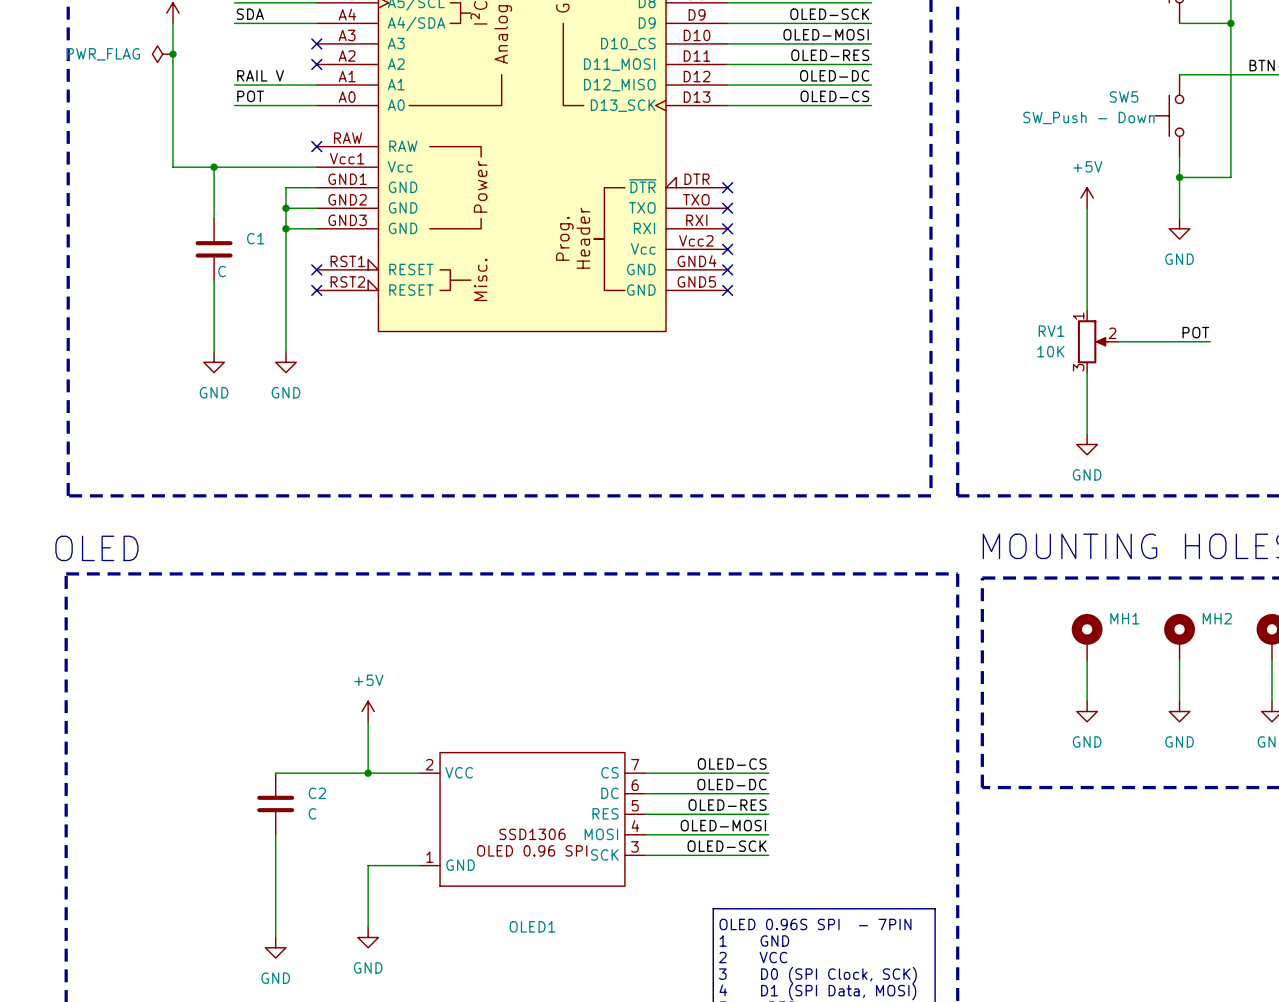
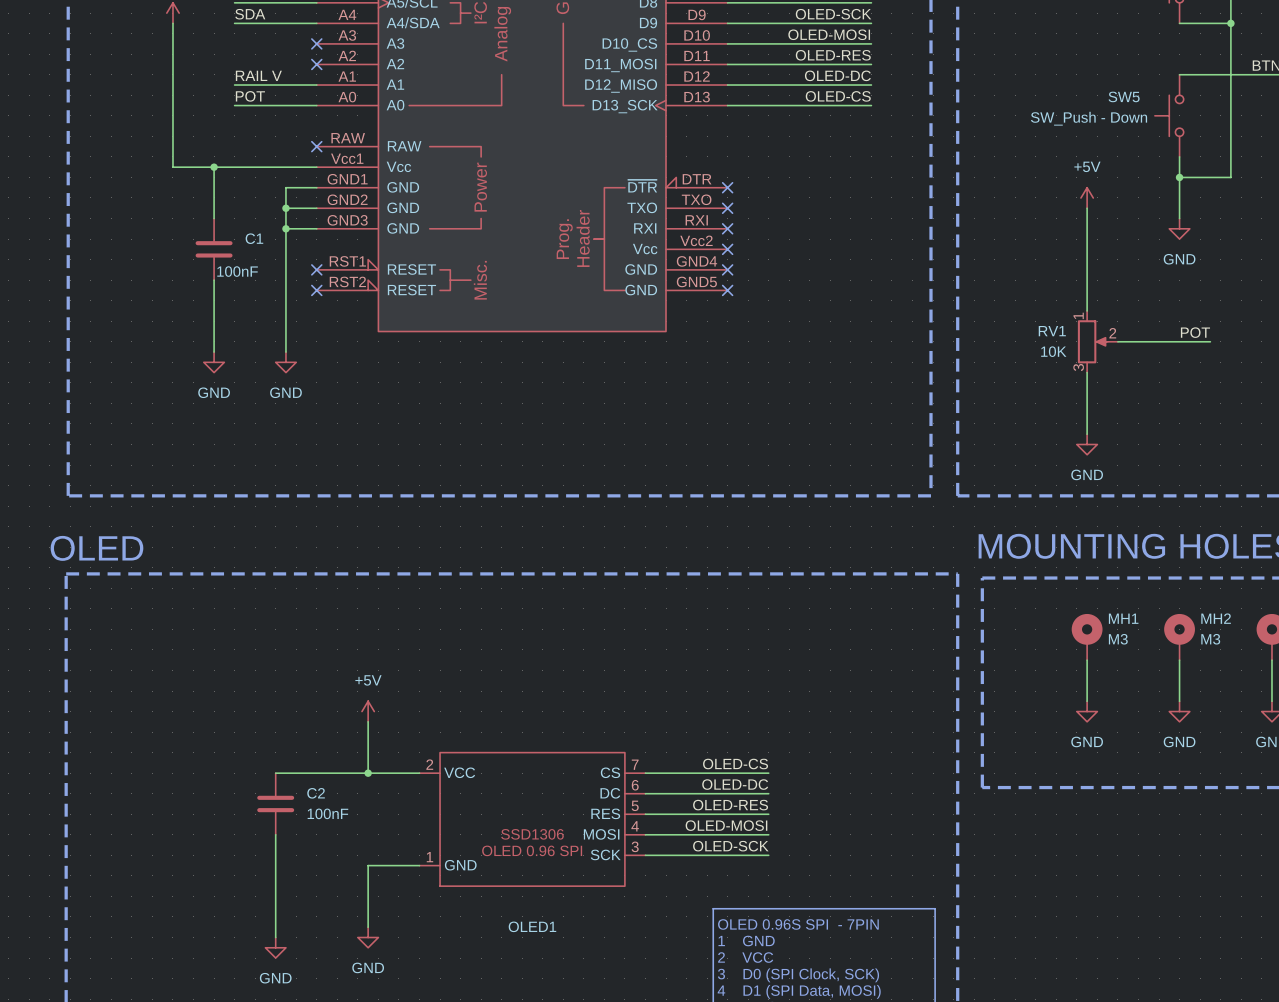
power symbol: PWR_FLAG (162, 54) -> none
junction: (172, 54) -> none
C1 value: C (222, 271) -> 100nF (237, 271)
MH1 value: none -> M3 (1118, 639)
MH2 value: none -> M3 (1210, 639)
C2 value: C (312, 813) -> 100nF (327, 813)

